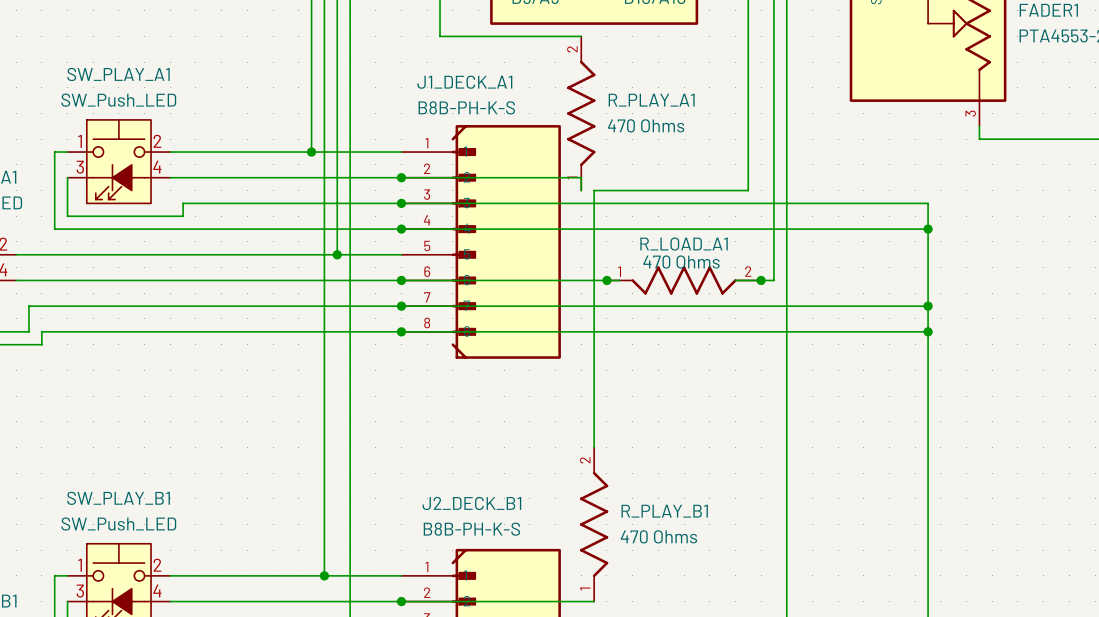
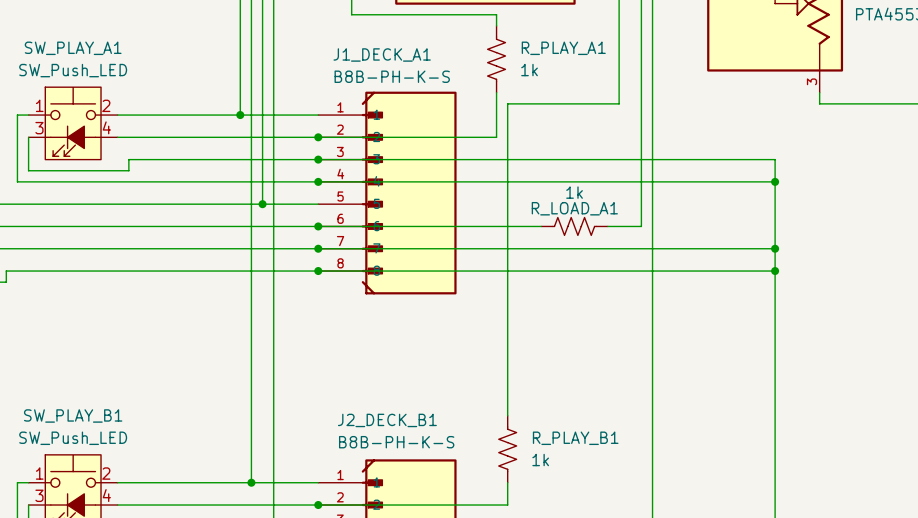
R_PLAY_A1 symbol: [567, 36, 596, 191] -> [487, 25, 506, 93]
wire: none -> (474, 14) (496, 14) (496, 25)
R_PLAY_A1 value: 470 Ohms (646, 125) -> 1k (529, 70)
wire: (748, 139) (748, 190) (594, 190) (594, 447) -> (619, 103) (507, 103) (507, 415)
wire: (581, 177) (581, 190) -> (474, 137) (496, 137) (496, 92)
R_LOAD_A1 value: 470 Ohms (681, 262) -> 1k (574, 192)
R_LOAD_A1 symbol: [606, 266, 762, 295] -> [541, 217, 608, 236]
junction: (606, 280) -> none
wire: none -> (507, 226) (541, 226)
junction: (761, 280) -> none
R_PLAY_B1 symbol: [580, 447, 609, 602] -> [498, 415, 517, 483]
R_PLAY_B1 value: 470 Ohms (658, 536) -> 1k (540, 460)
wire: none -> (507, 482) (507, 505) (485, 505)

